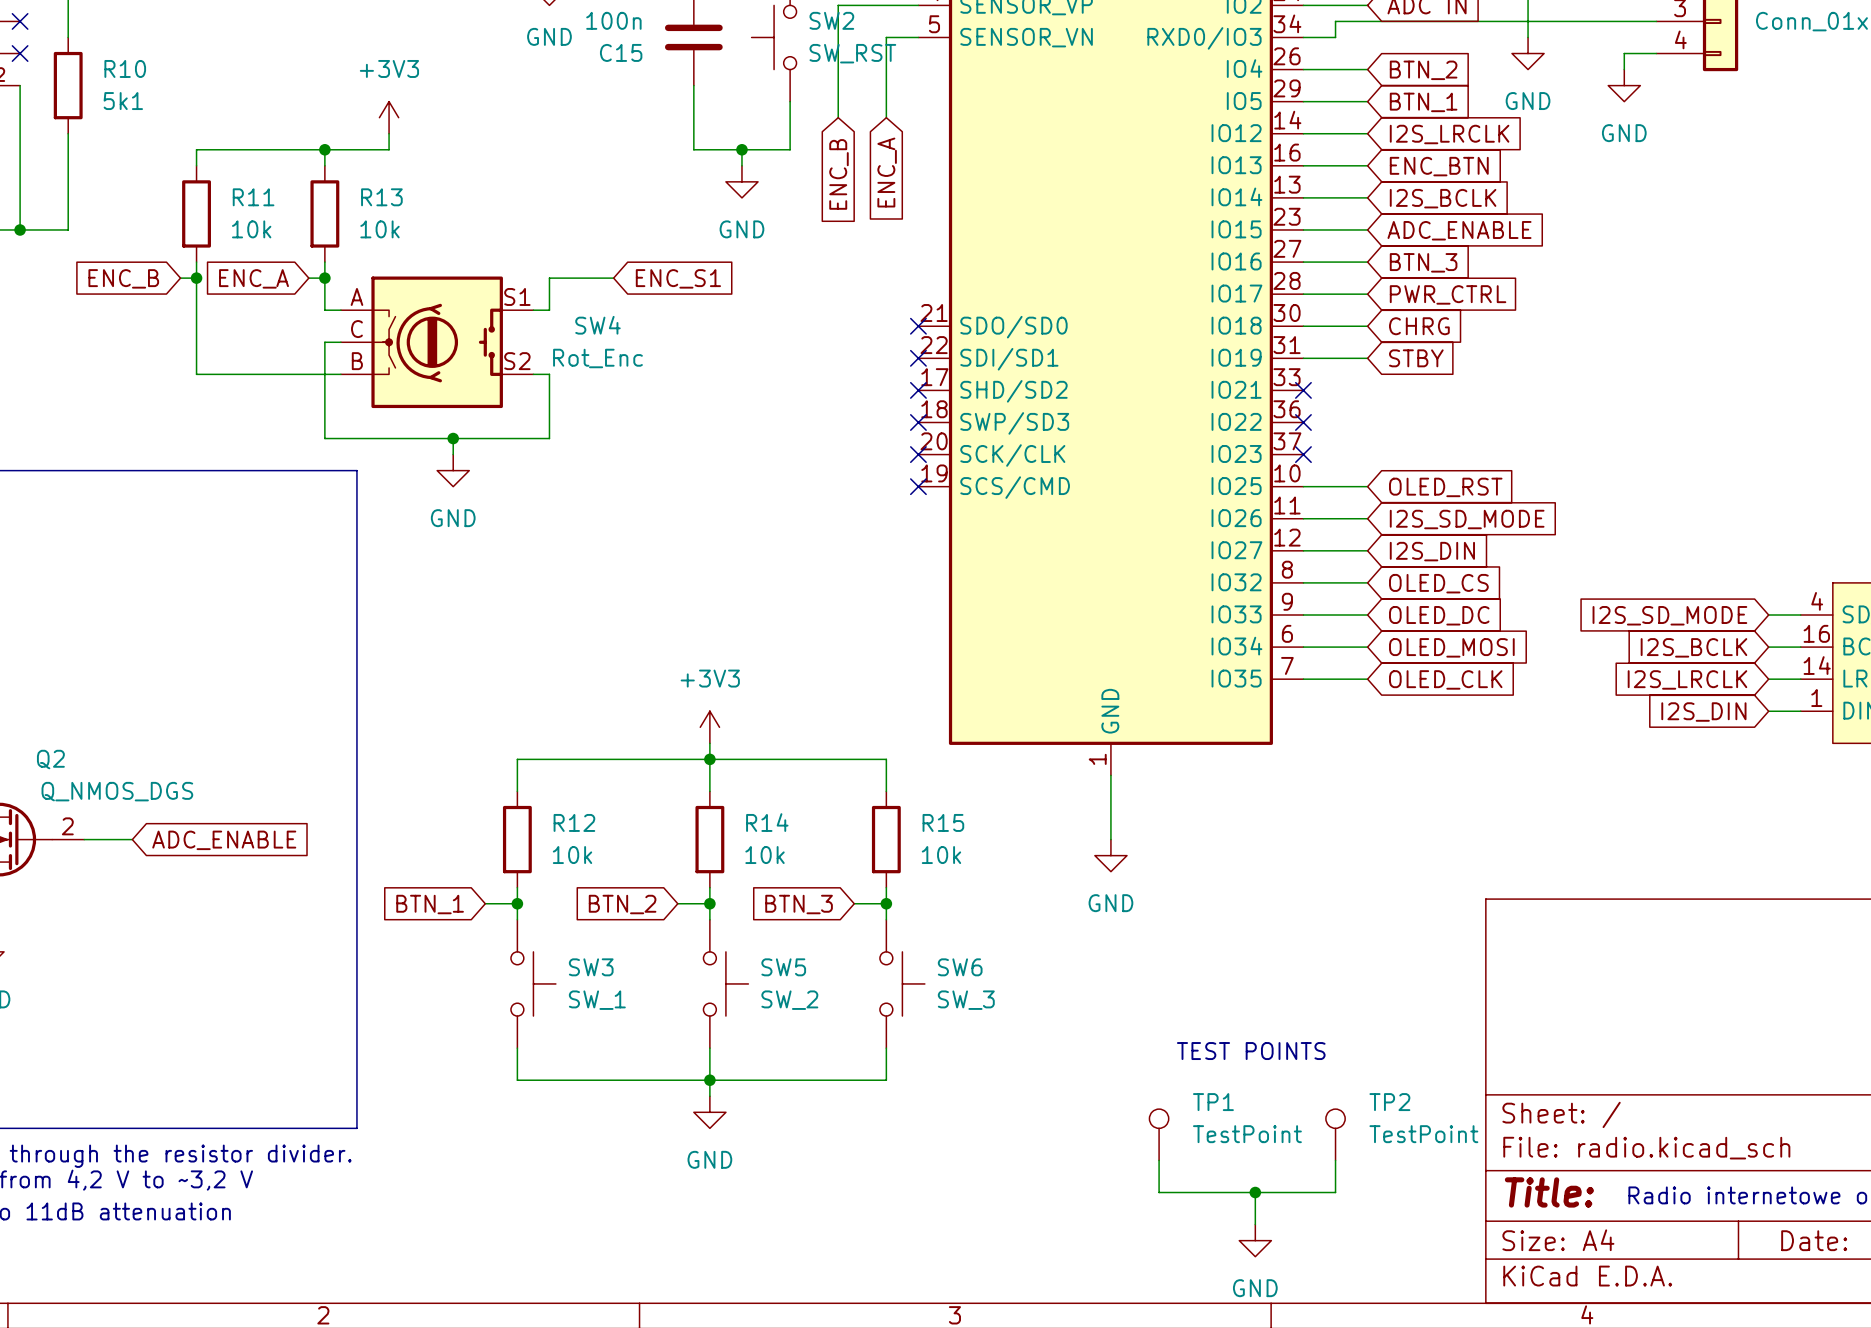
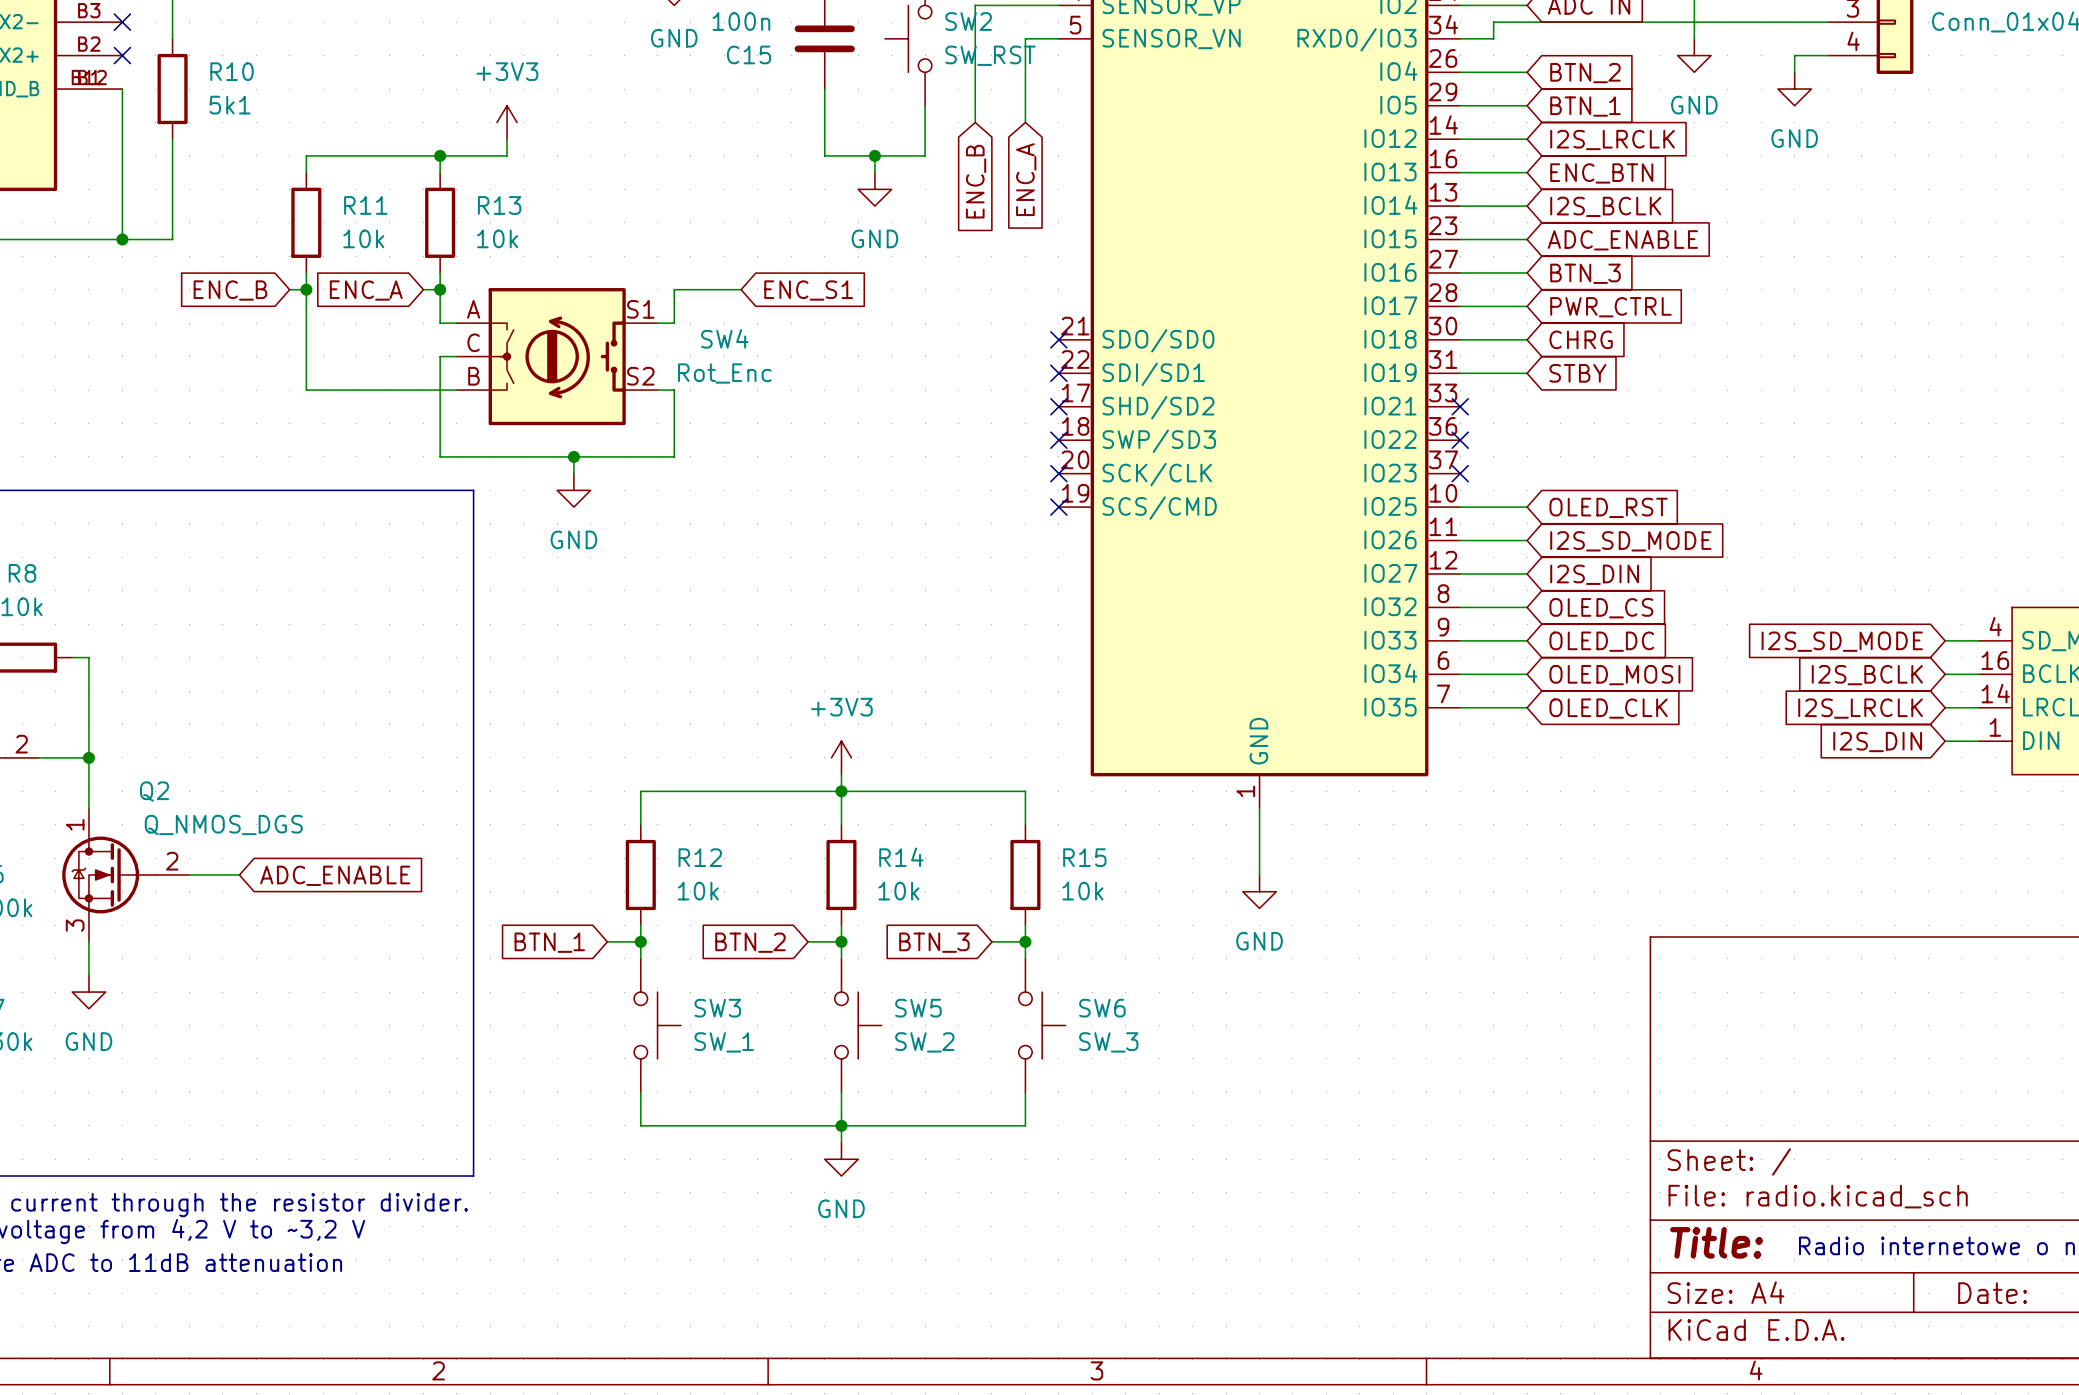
SW4 symbol: [340, 276, 534, 409] -> [456, 288, 658, 426]
text: TEST POINTS (1251, 1051) -> none
TP1: TestPoint (1159, 1134) -> none
TP2: TestPoint (1335, 1134) -> none
wire: (1159, 1160) (1159, 1192) (1335, 1192) (1335, 1160) -> none
wire: (1255, 1192) (1255, 1224) -> none
junction: (1255, 1192) -> none
power symbol: GND (1255, 1240) -> none

